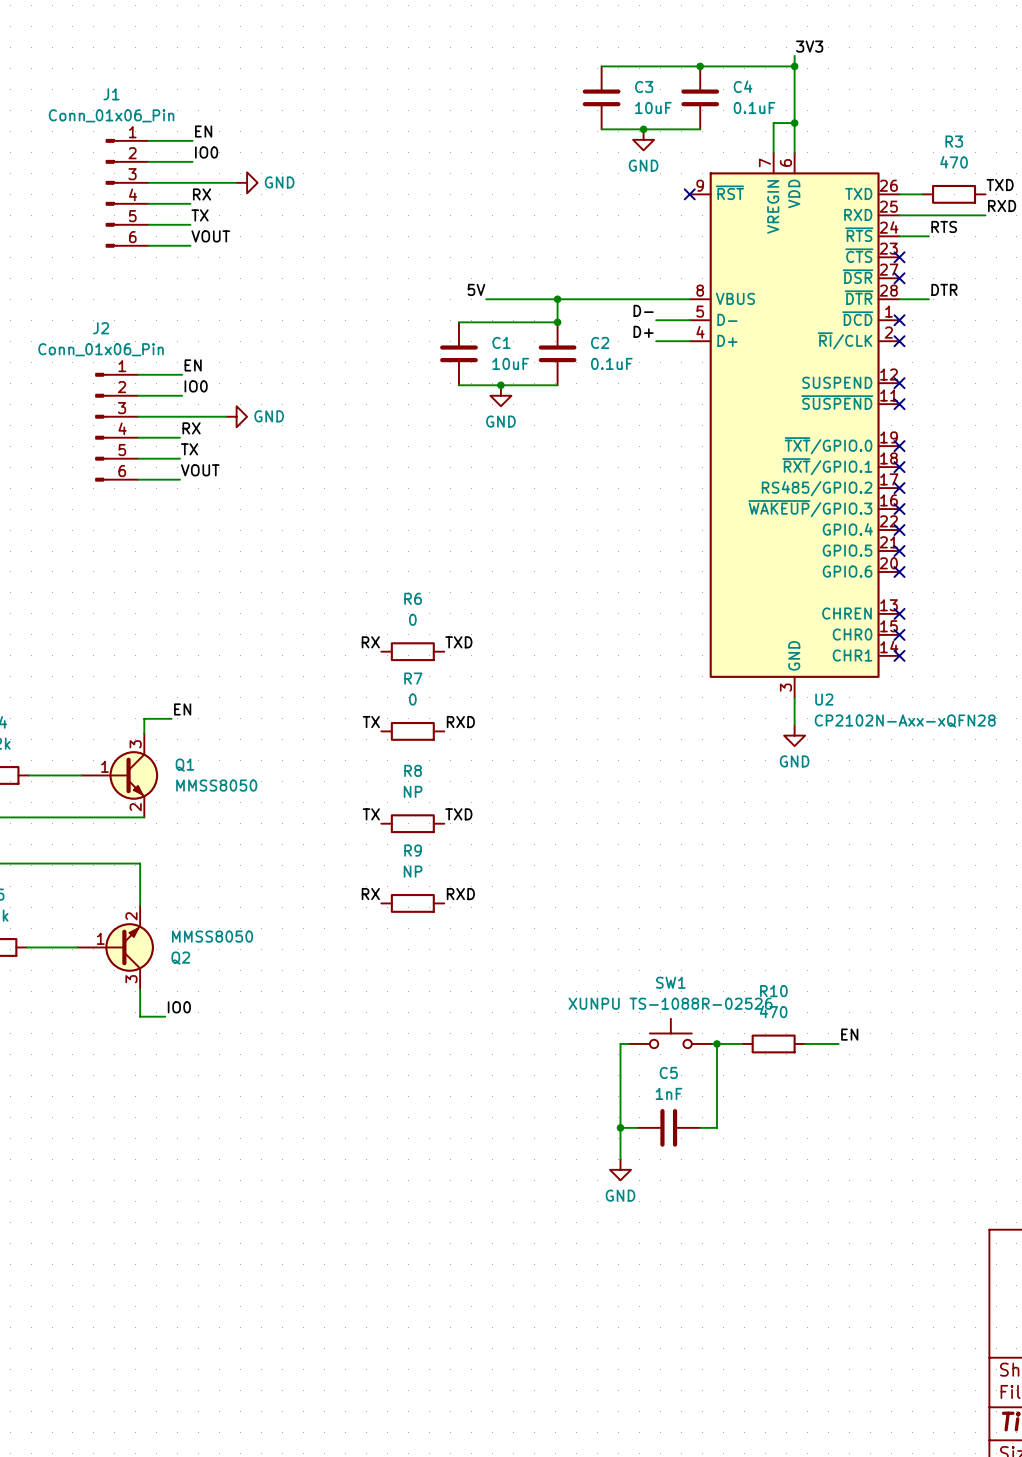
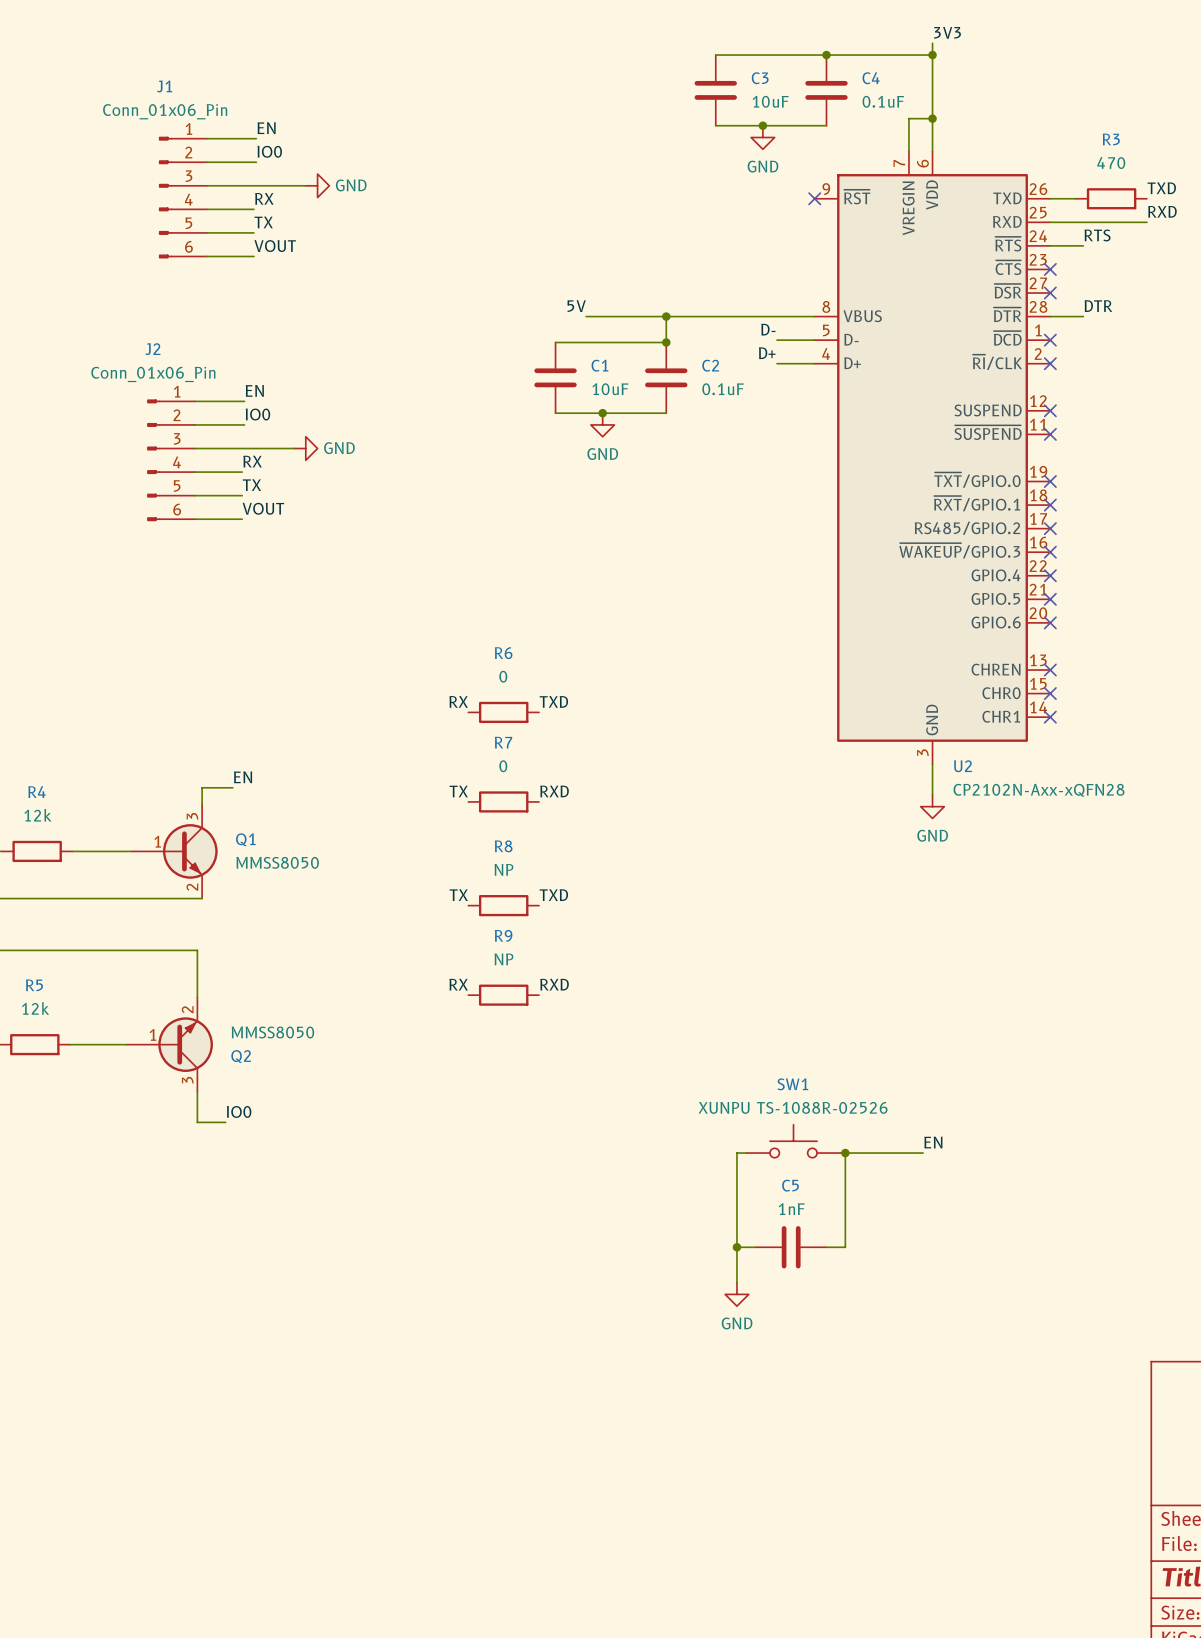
label position: EN (849, 1034) -> EN (933, 1142)
wire: none -> (873, 1153) (923, 1153)
R10: 470 (773, 1043) -> none
wire: (805, 1043) (838, 1043) -> none

